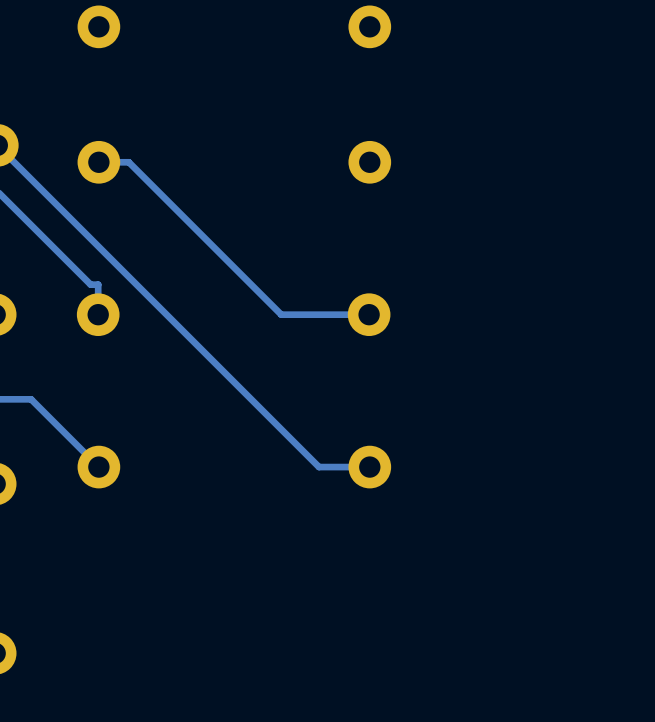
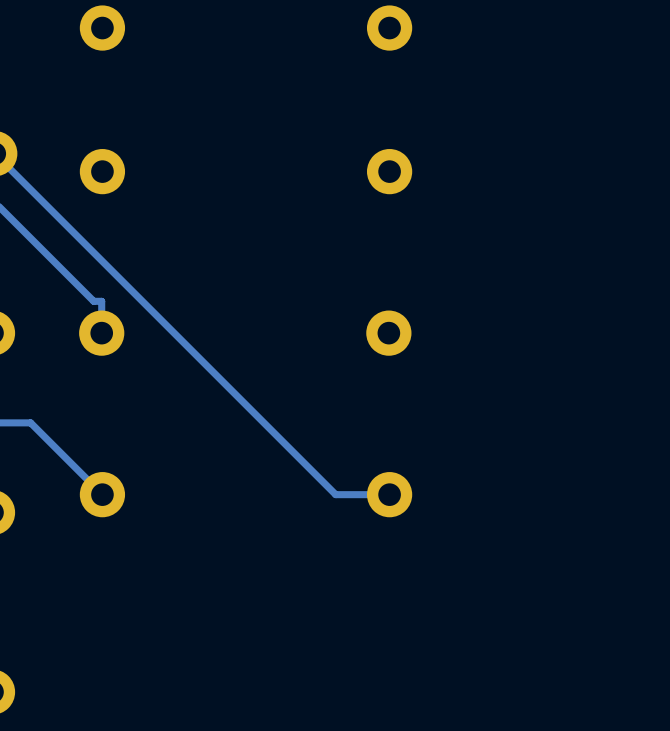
track: (98, 162) (128, 162) (281, 314) (369, 314) -> none

